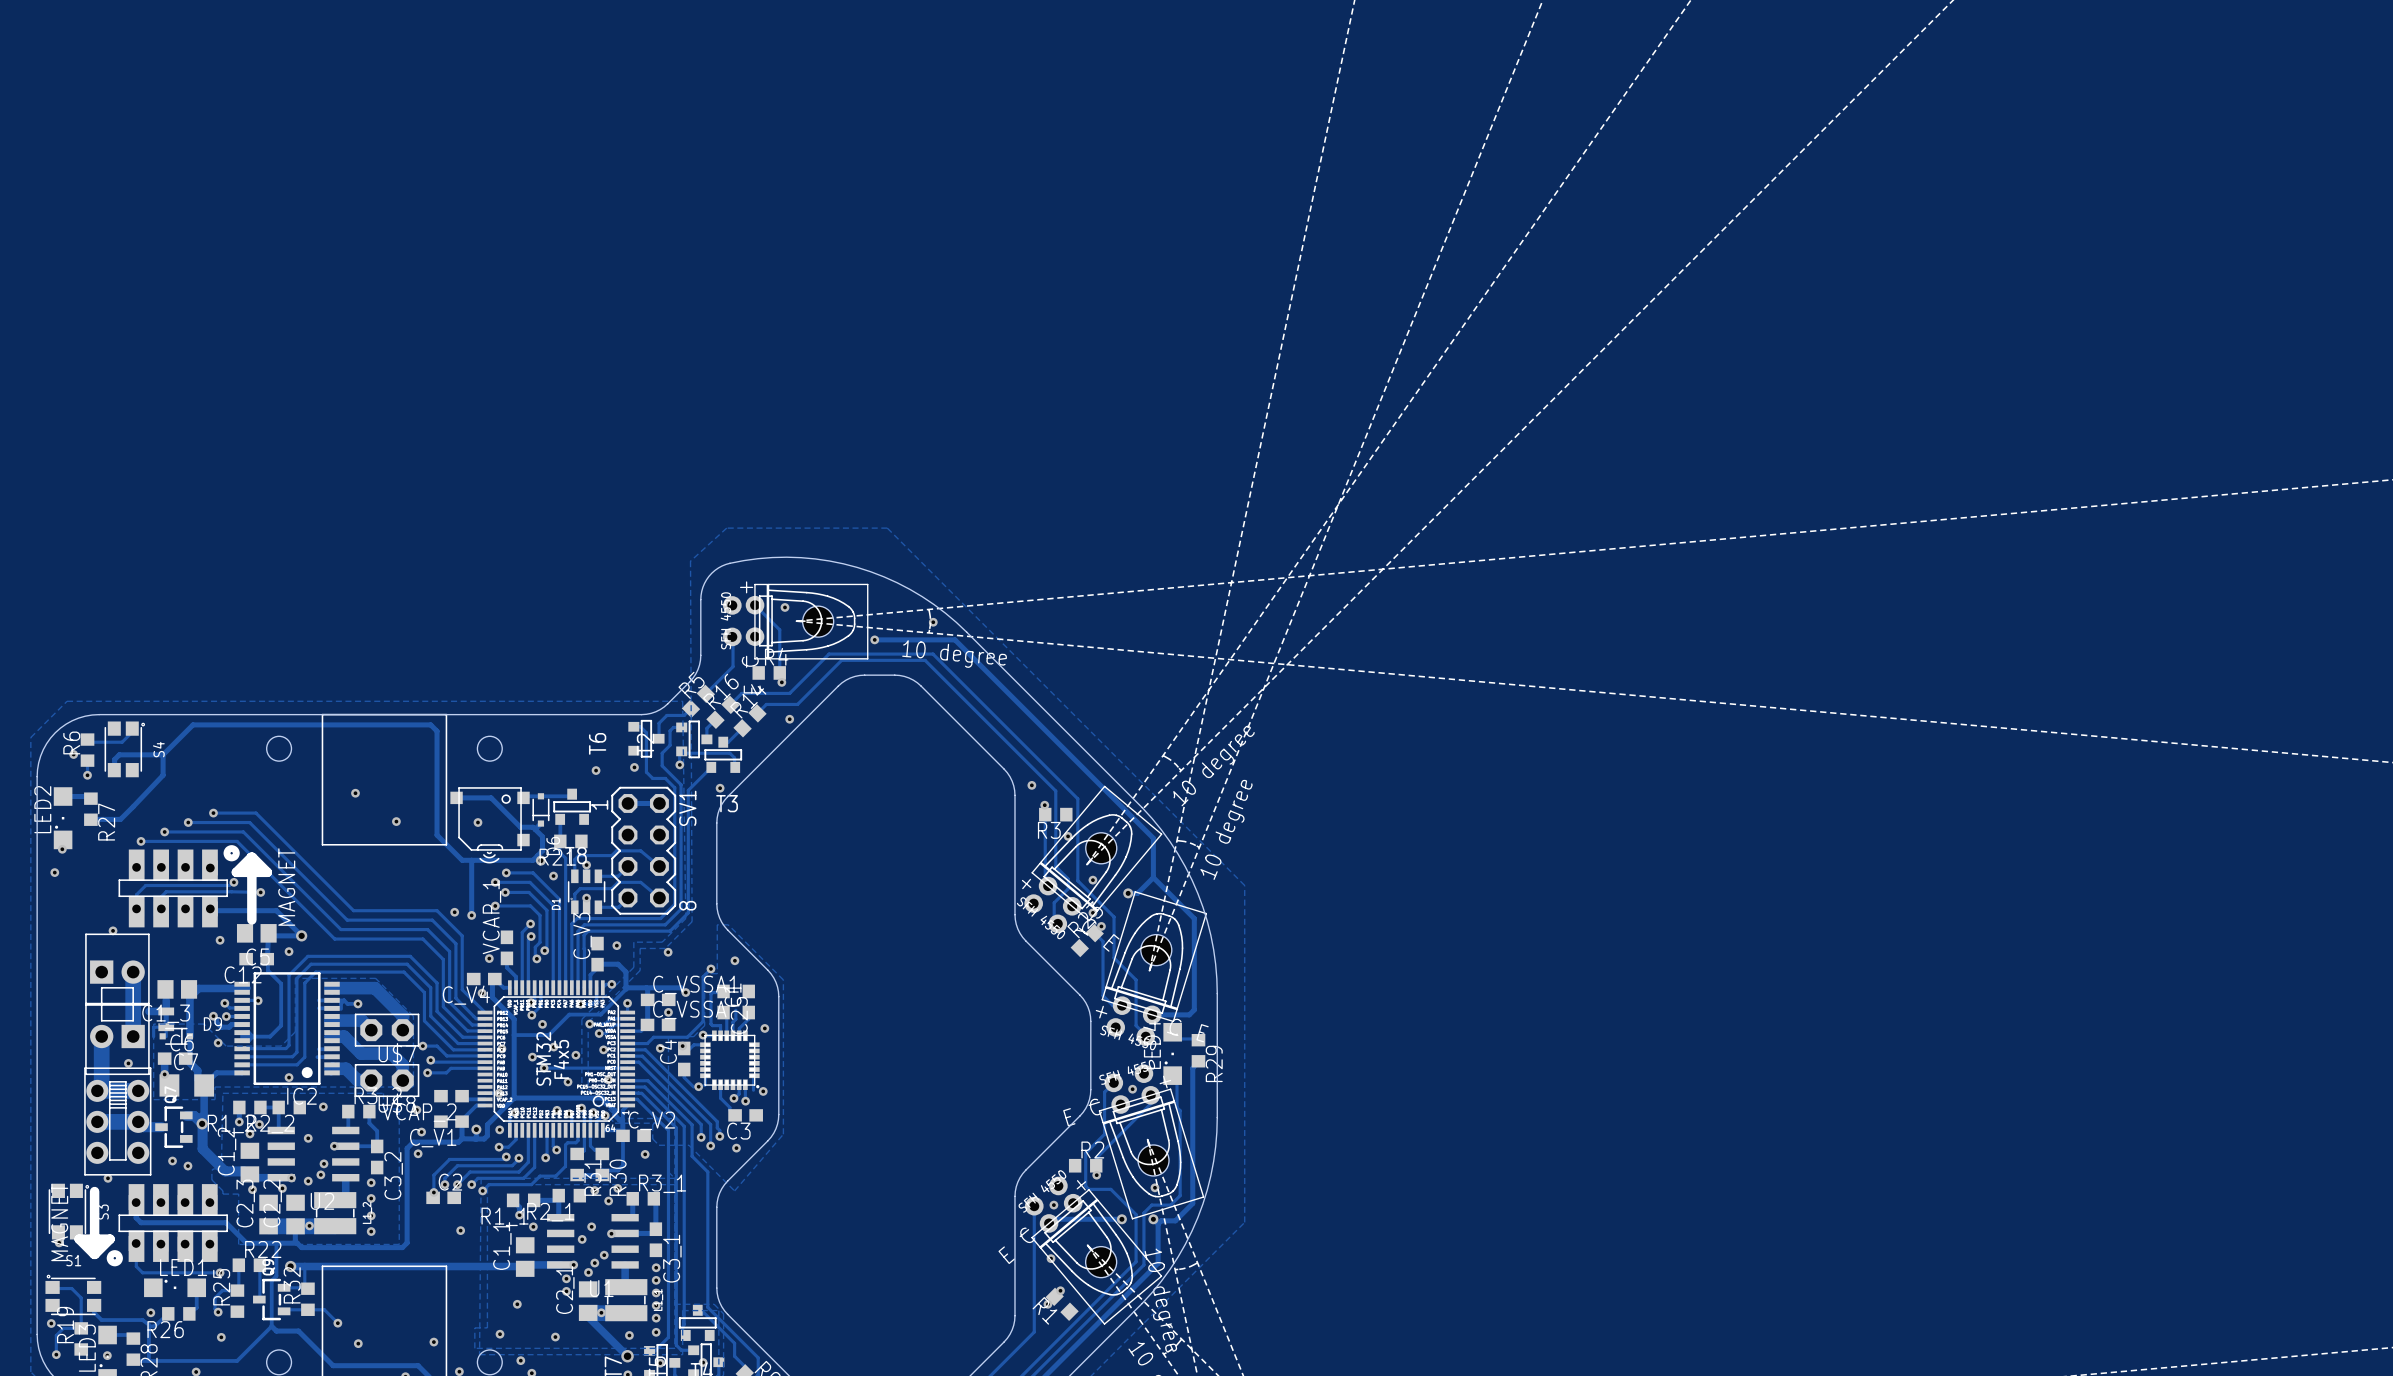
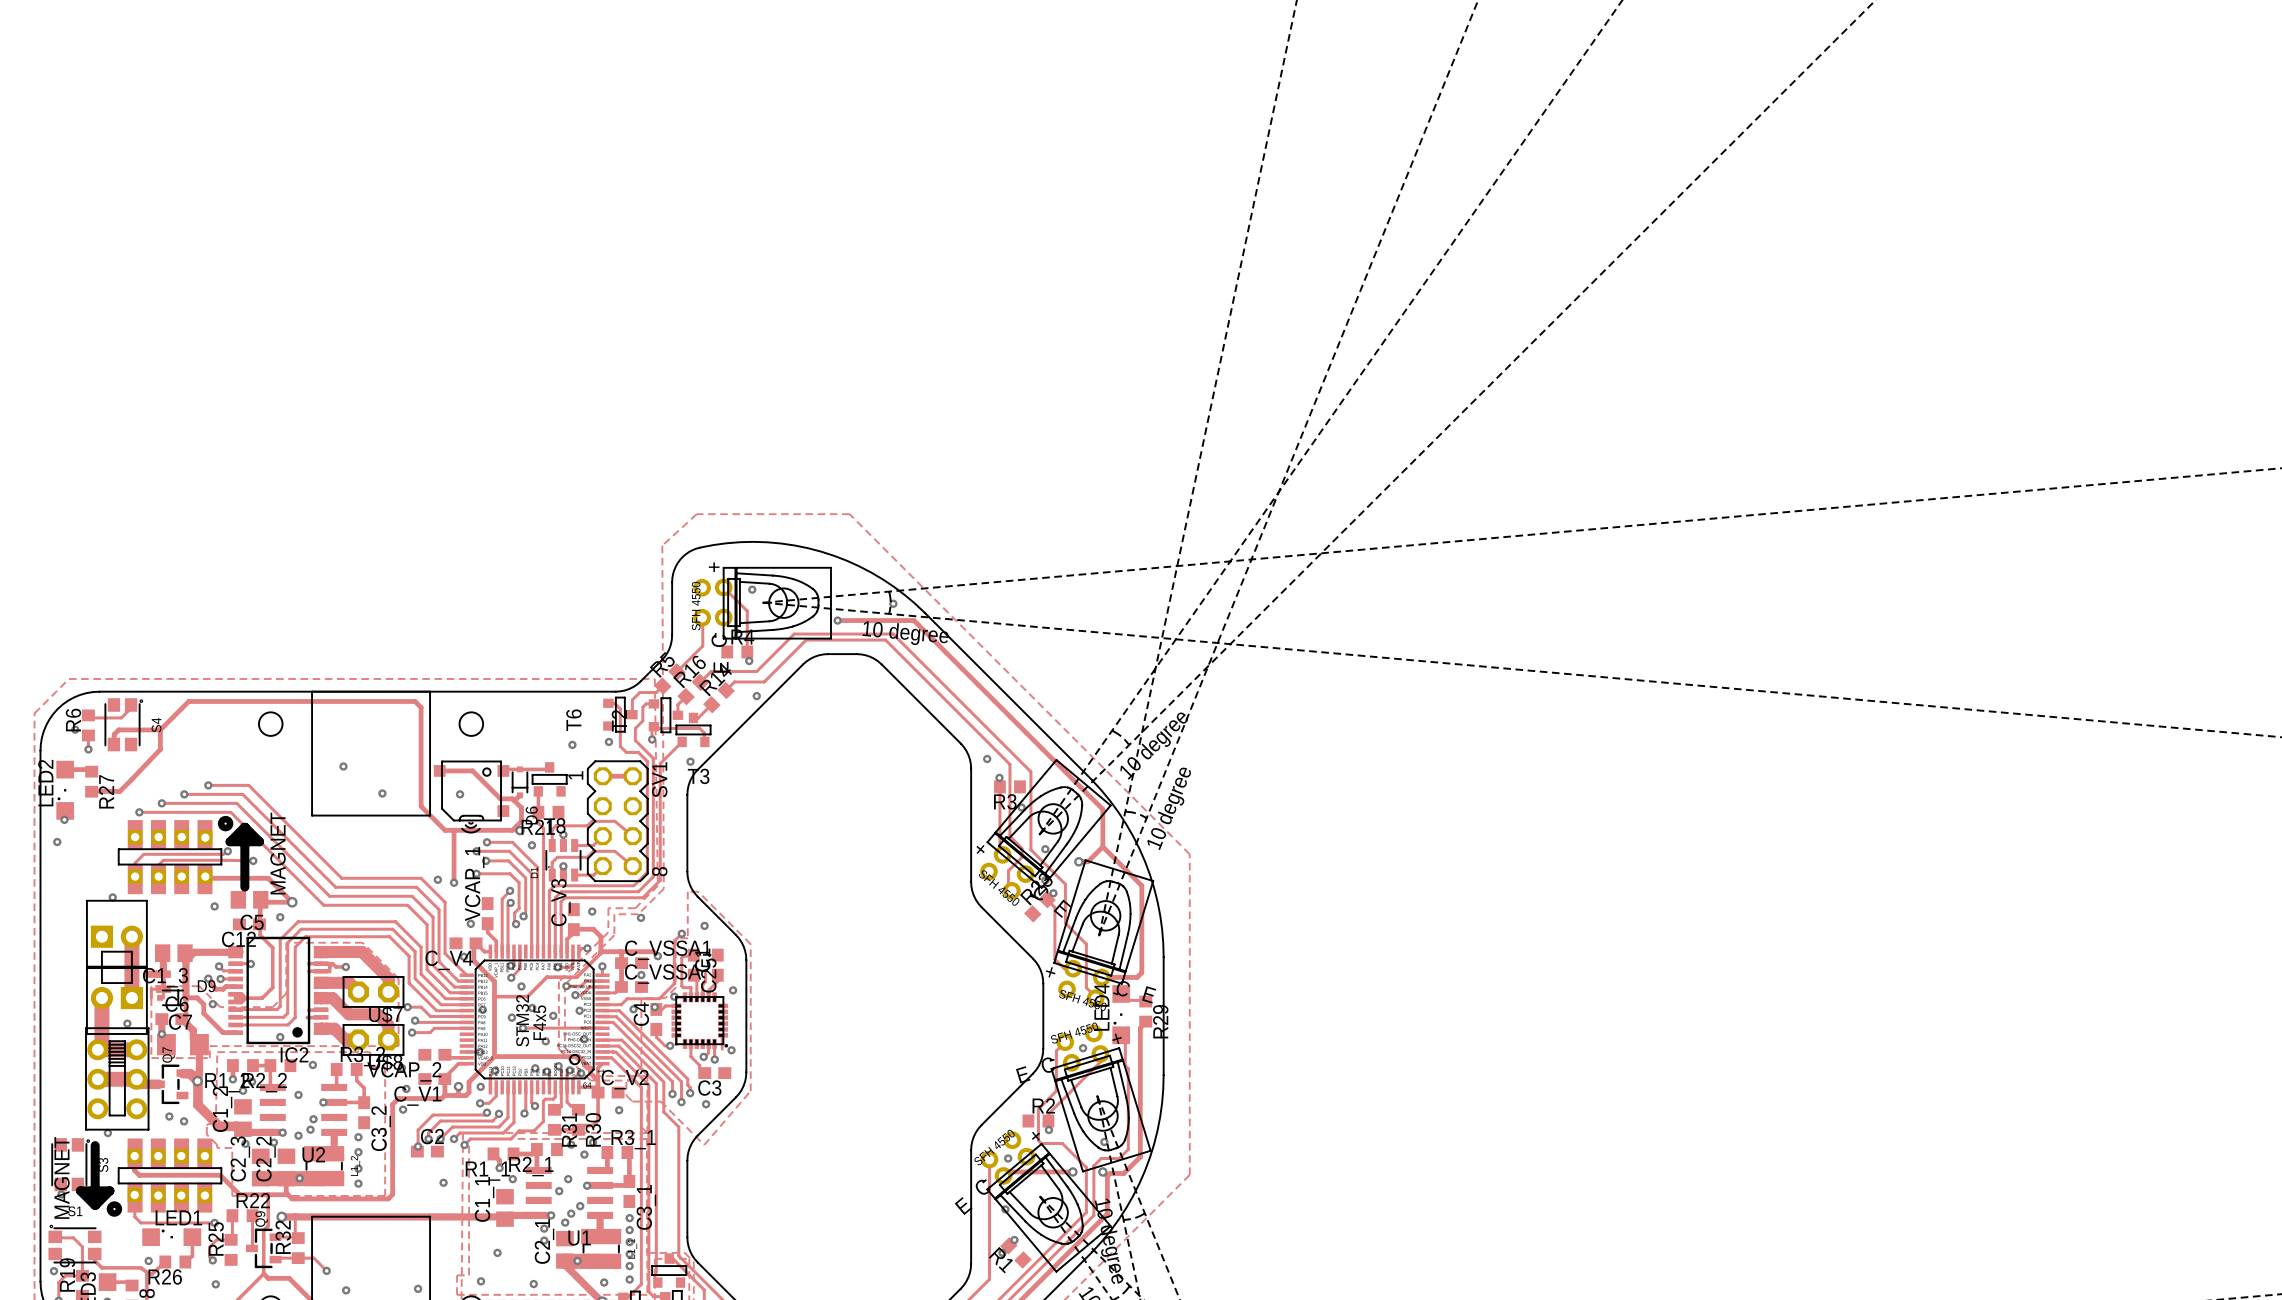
track: (228, 1072) (216, 1072) (204, 1085) -> (223, 1032) (203, 1013) (203, 1004) (197, 997) (185, 997)

